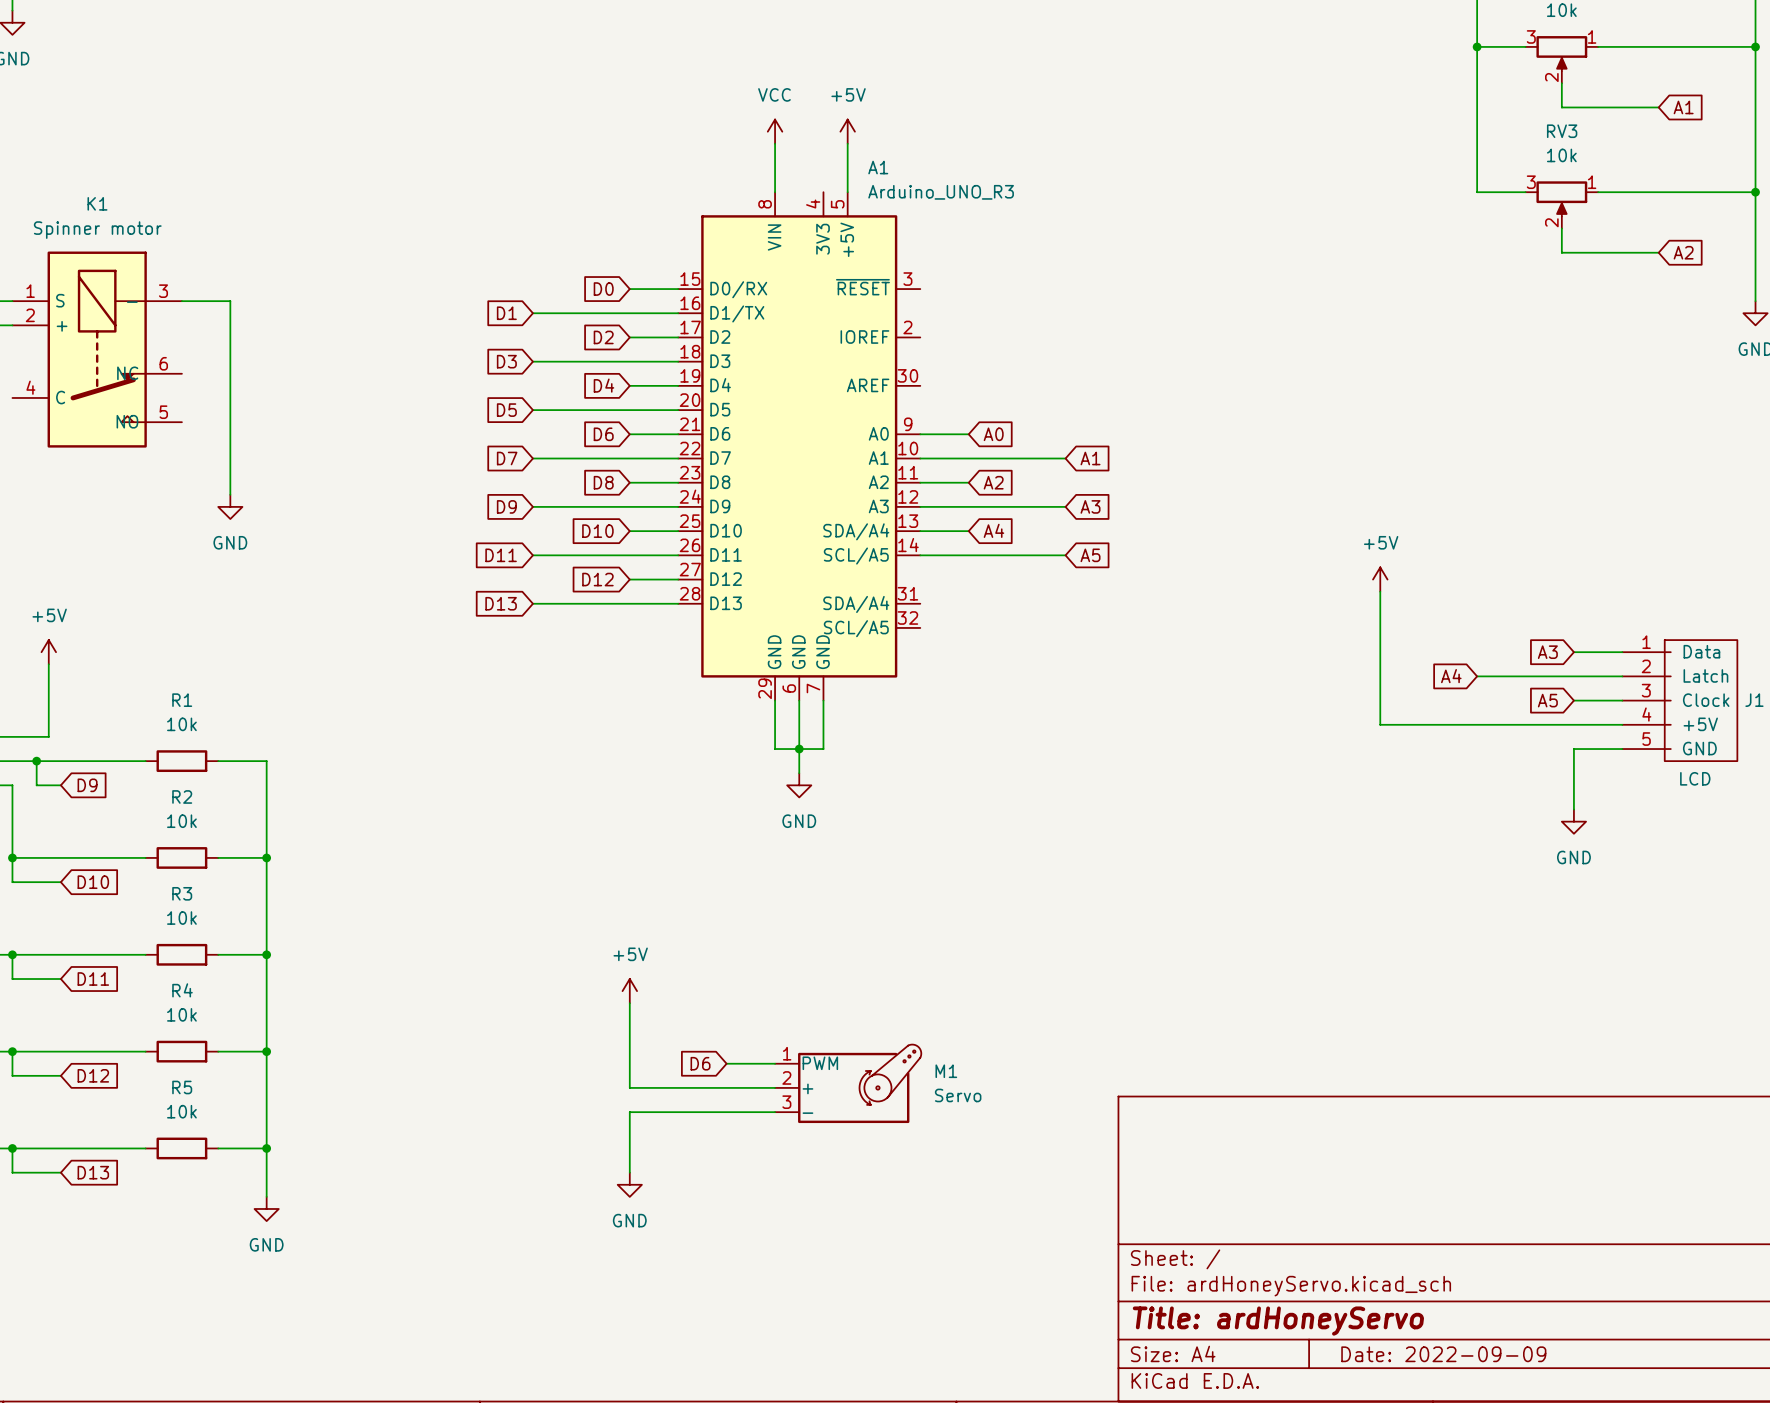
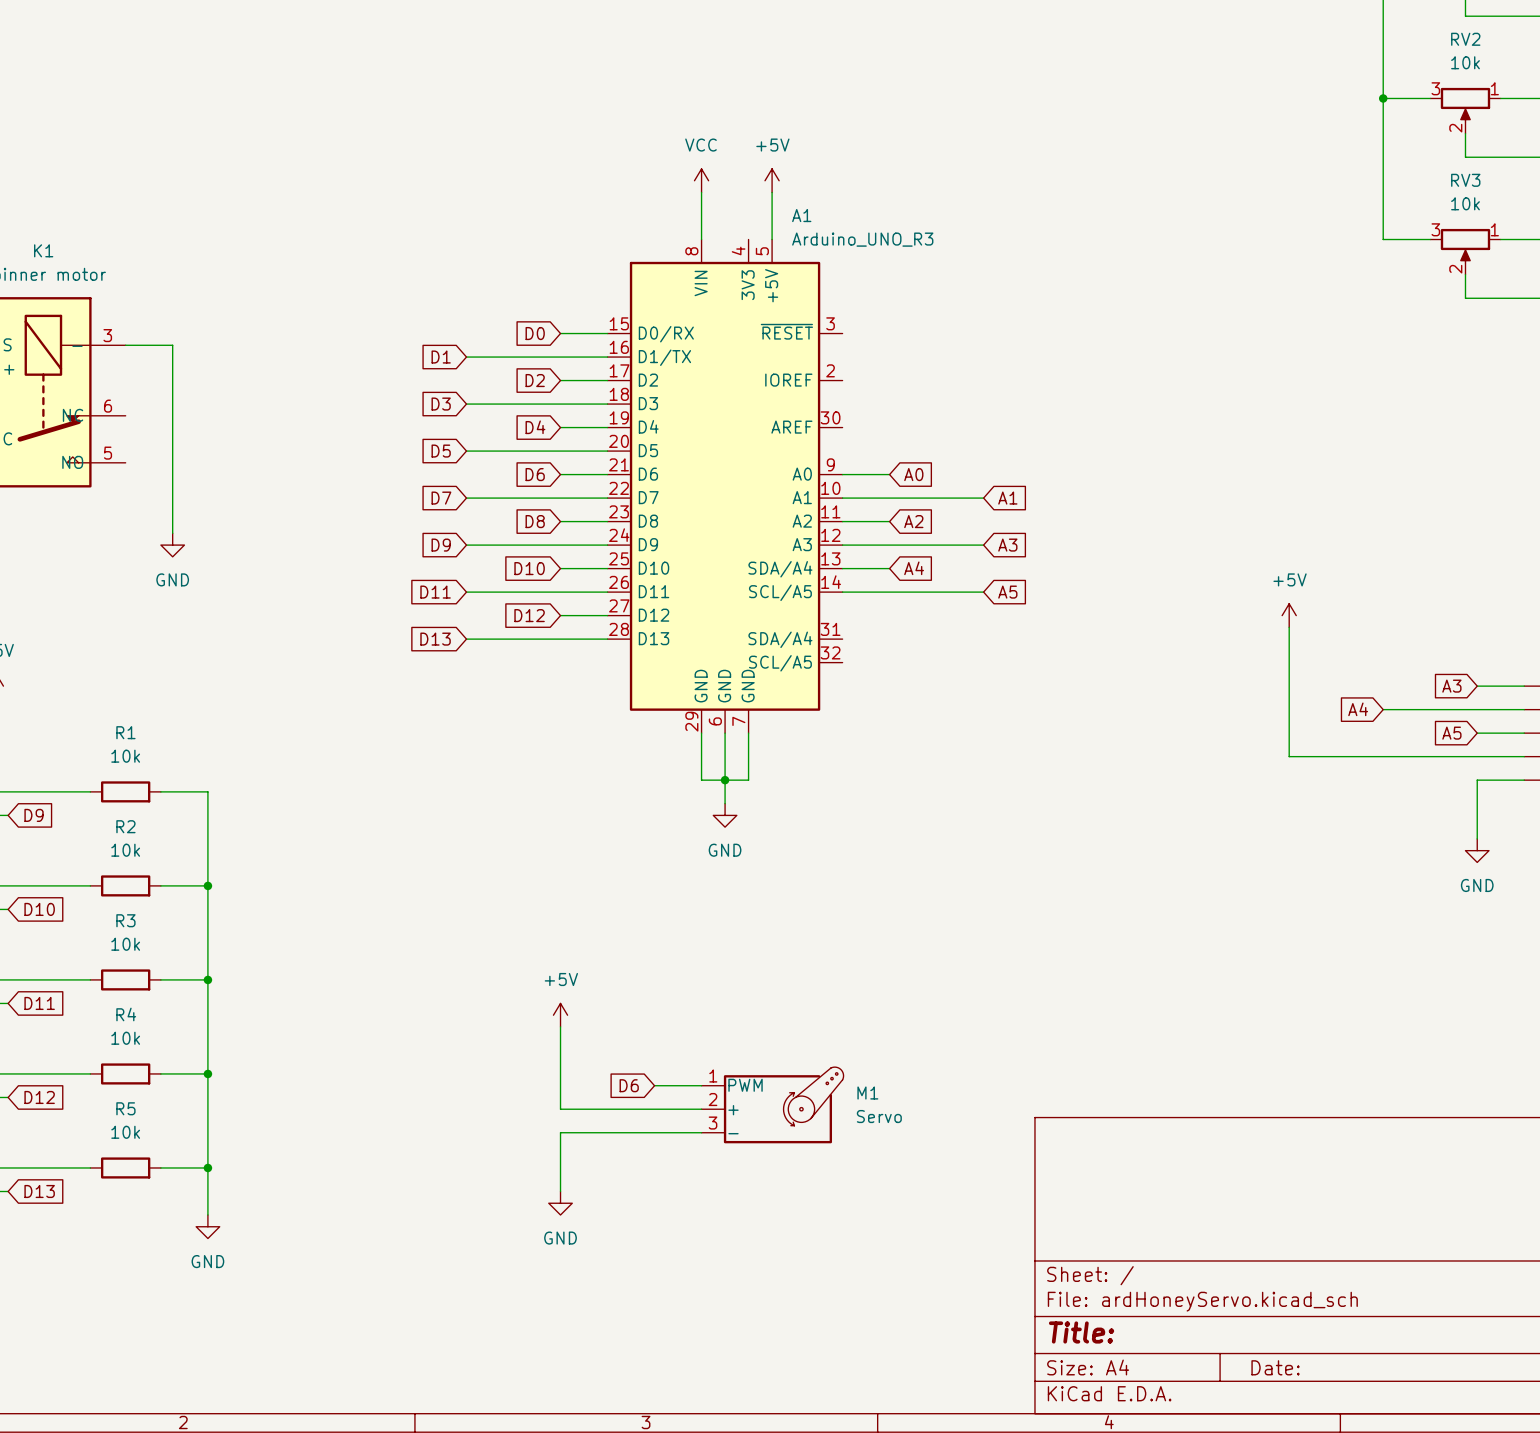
title block: Title: ardHoneyServo (1278, 1321) -> Title: (1081, 1332)
title block: Date: 2022-09-09 (1443, 1354) -> Date: (1275, 1367)

